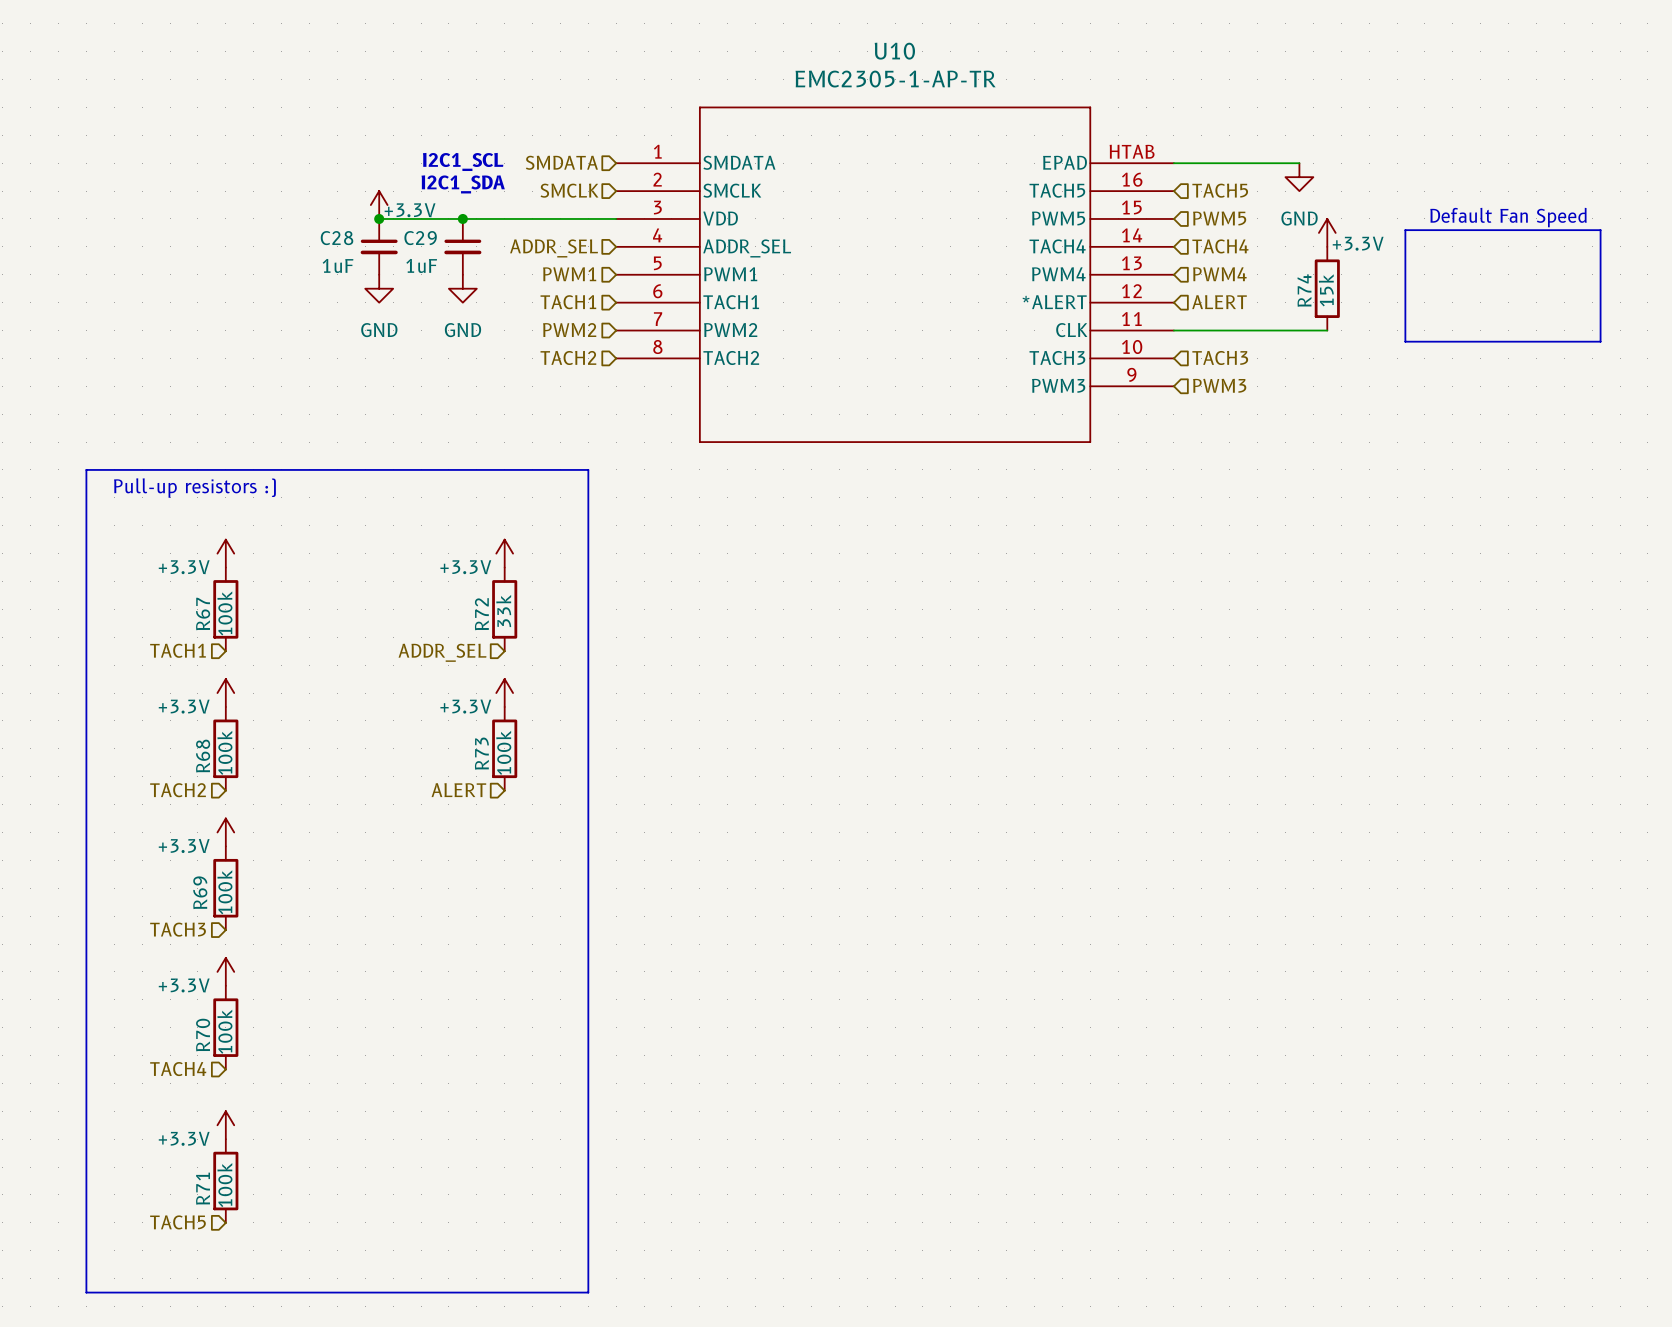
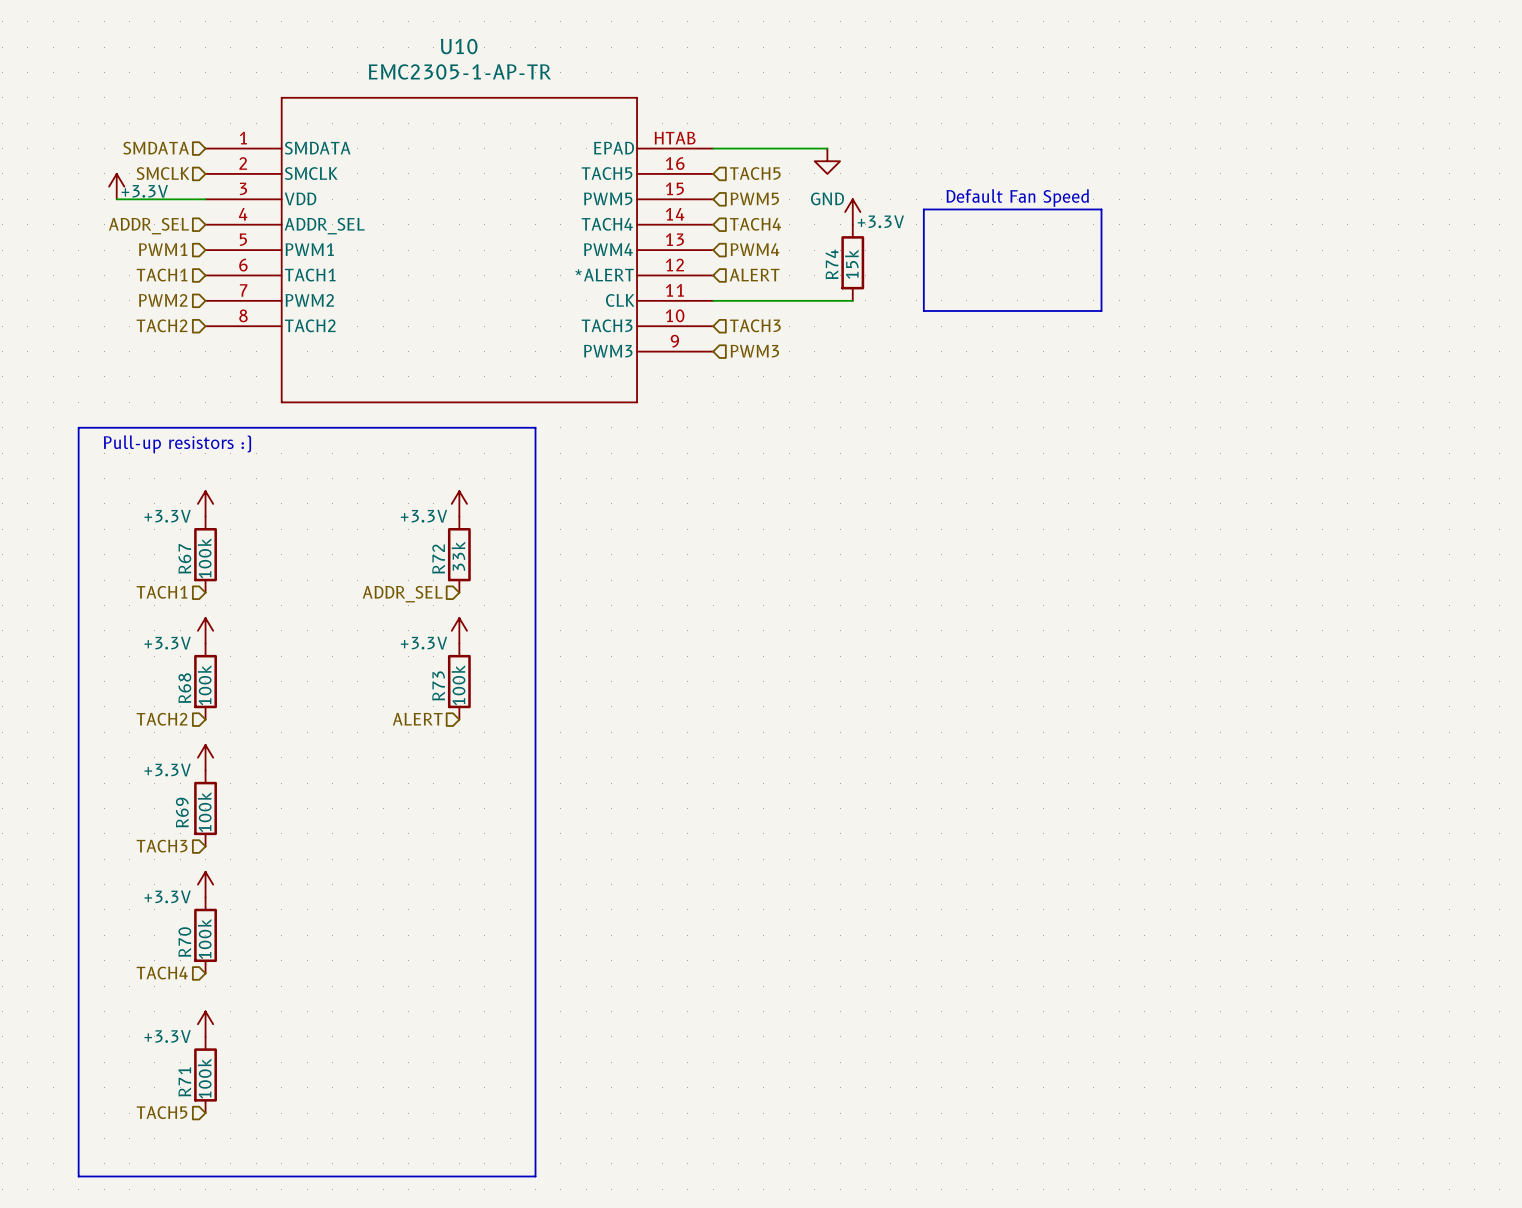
text: I2C1_SCL (463, 161) -> none
hierarchical label: none -> SMDATA (156, 148)
hierarchical label: SMDATA (561, 162) -> none
wire: none -> (713, 148) (827, 148)
wire: (1173, 163) (1299, 163) -> none
power symbol: none -> GND (827, 161)
power symbol: GND (1299, 177) -> none
text: I2C1_SDA (463, 184) -> none
hierarchical label: none -> SMCLK (163, 173)
hierarchical label: SMCLK (569, 190) -> none
hierarchical label: none -> TACH5 (755, 173)
hierarchical label: TACH5 (1220, 190) -> none
power symbol position: +3.3V (379, 205) -> +3.3V (116, 186)
text: none -> Default Fan Speed (1017, 198)
text: Default Fan Speed (1508, 217) -> none
wire: none -> (116, 199) (205, 199)
wire: (379, 218) (616, 218) -> none
junction: (379, 218) -> none
junction: (462, 218) -> none
hierarchical label: none -> PWM5 (754, 198)
hierarchical label: PWM5 (1219, 218) -> none
line: none -> (923, 209) (1101, 209) (1101, 311) (923, 311) (923, 209)
line: (1405, 230) (1600, 230) (1600, 341) (1405, 341) (1405, 230) -> none
power symbol: none -> +3.3V (852, 212)
power symbol: +3.3V (1327, 232) -> none
C28: 1uF (379, 246) -> none
C29: 1uF (462, 246) -> none
hierarchical label: none -> TACH4 (755, 224)
hierarchical label: TACH4 (1220, 246) -> none
hierarchical label: none -> ADDR_SEL (148, 226)
hierarchical label: ADDR_SEL (554, 248) -> none
hierarchical label: none -> PWM1 (163, 249)
hierarchical label: PWM1 (569, 274) -> none
hierarchical label: none -> PWM4 (754, 249)
U10 position: (895, 274) -> (459, 250)
hierarchical label: PWM4 (1219, 274) -> none
power symbol: GND (379, 288) -> none
power symbol: GND (462, 288) -> none
R74 position: (1327, 288) -> (852, 262)
hierarchical label: none -> TACH1 (162, 275)
hierarchical label: TACH1 (568, 302) -> none
hierarchical label: none -> ALERT (754, 274)
hierarchical label: ALERT (1219, 302) -> none
hierarchical label: none -> PWM2 (163, 300)
hierarchical label: PWM2 (569, 330) -> none
wire: none -> (713, 300) (852, 300)
wire: (1173, 330) (1327, 330) -> none
hierarchical label: none -> TACH2 (162, 325)
hierarchical label: TACH2 (568, 357) -> none
hierarchical label: none -> TACH3 (755, 325)
hierarchical label: TACH3 (1220, 357) -> none
hierarchical label: none -> PWM3 (754, 351)
hierarchical label: PWM3 (1219, 385) -> none

